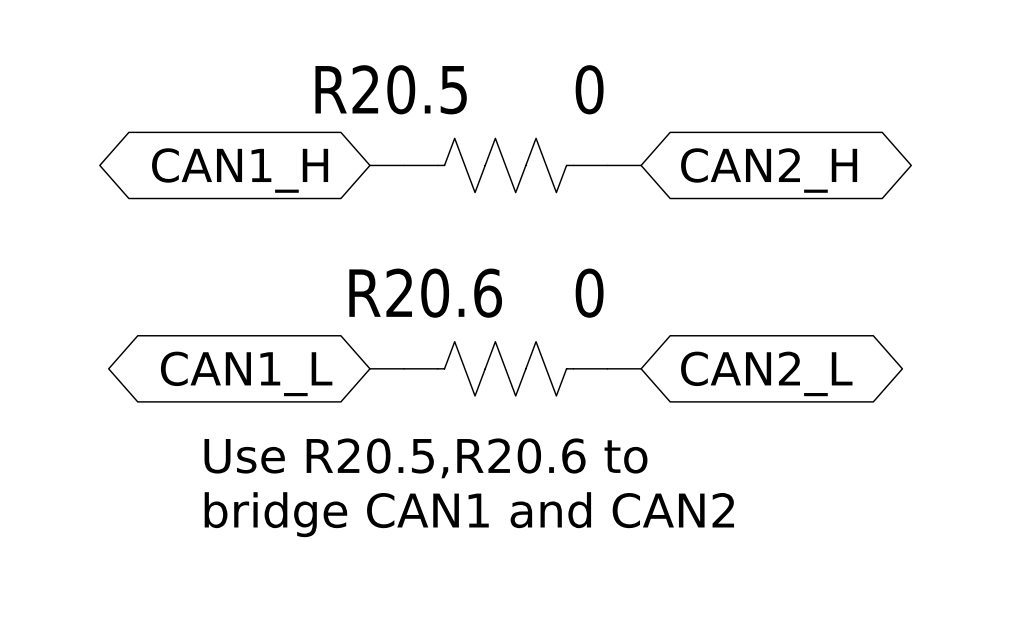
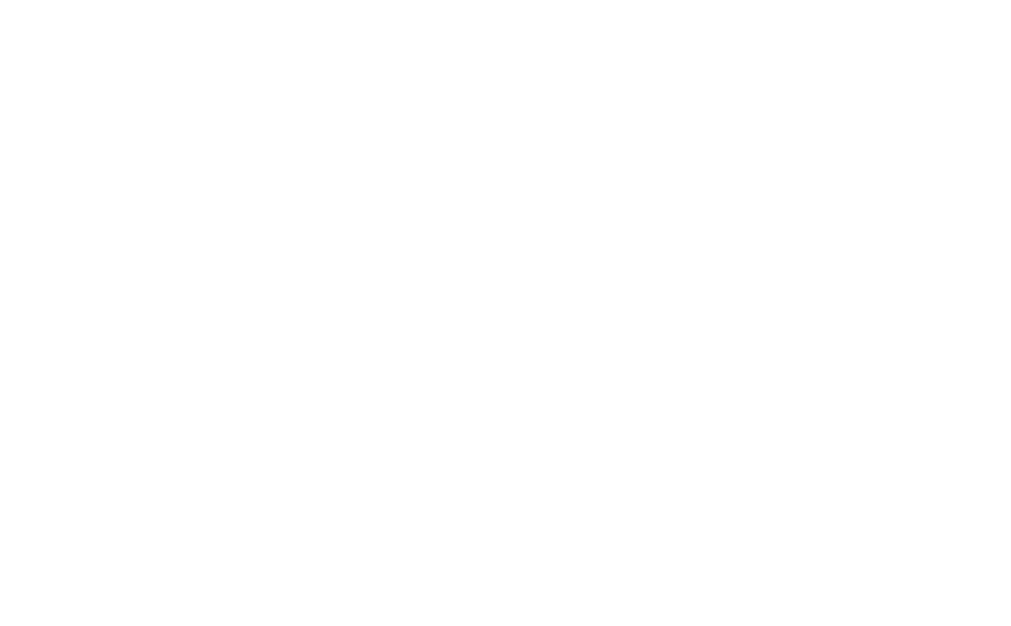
wire: (369, 165) (403, 165) -> none
R20.5: 0 (505, 165) -> none
wire: (607, 165) (641, 165) -> none
global label: CAN1_H (240, 170) -> none
global label: CAN2_H (769, 170) -> none
wire: (369, 368) (403, 368) -> none
R20.6: 0 (505, 368) -> none
wire: (607, 368) (641, 368) -> none
global label: CAN1_L (246, 373) -> none
global label: CAN2_L (766, 373) -> none
text: Use R20.5,R20.6 to (425, 458) -> none
text: bridge CAN1 and CAN2 (469, 514) -> none

